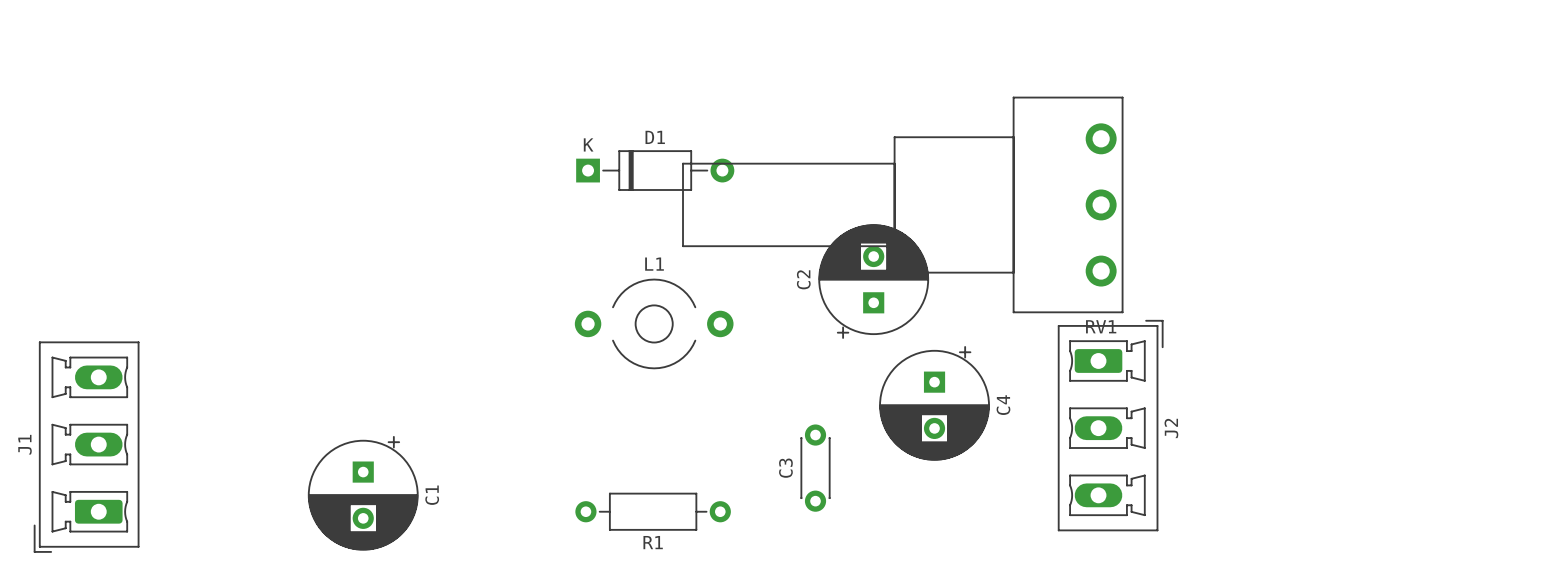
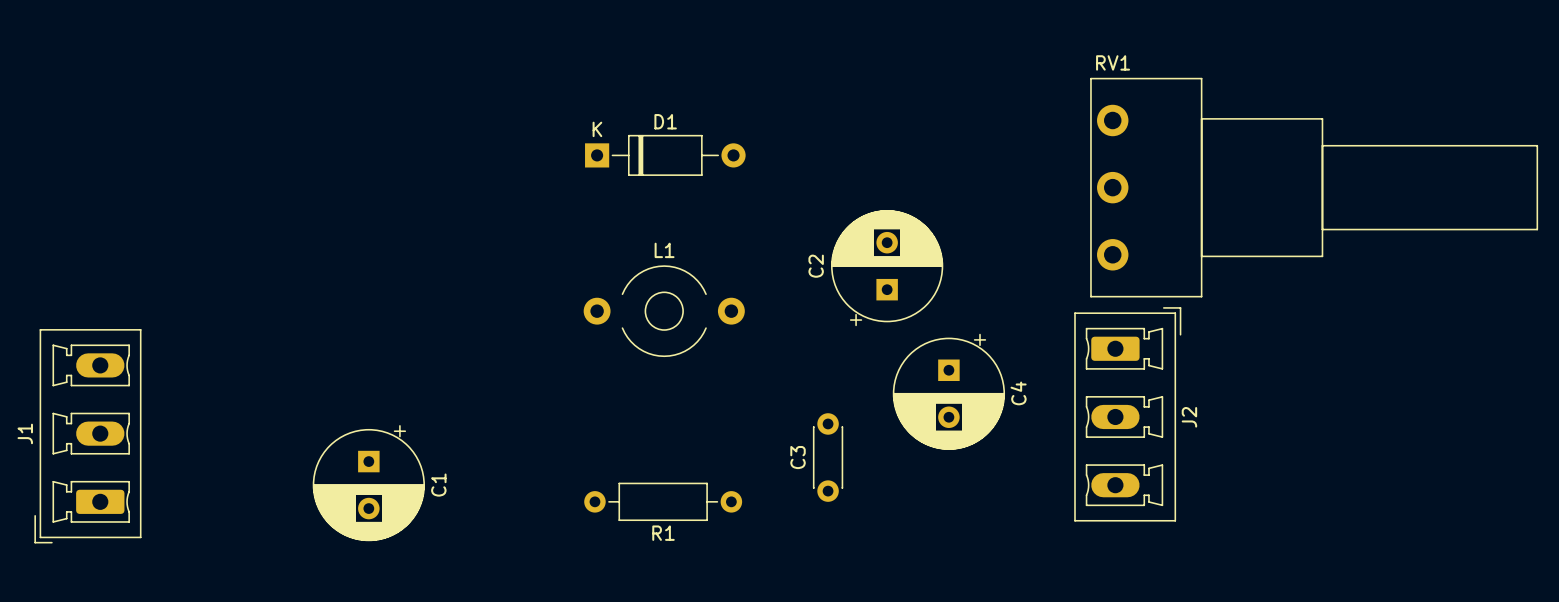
RV1 rotation: 0° (902, 204) -> 180° (1314, 187)
RV1 position: (902, 204) -> (1314, 187)

